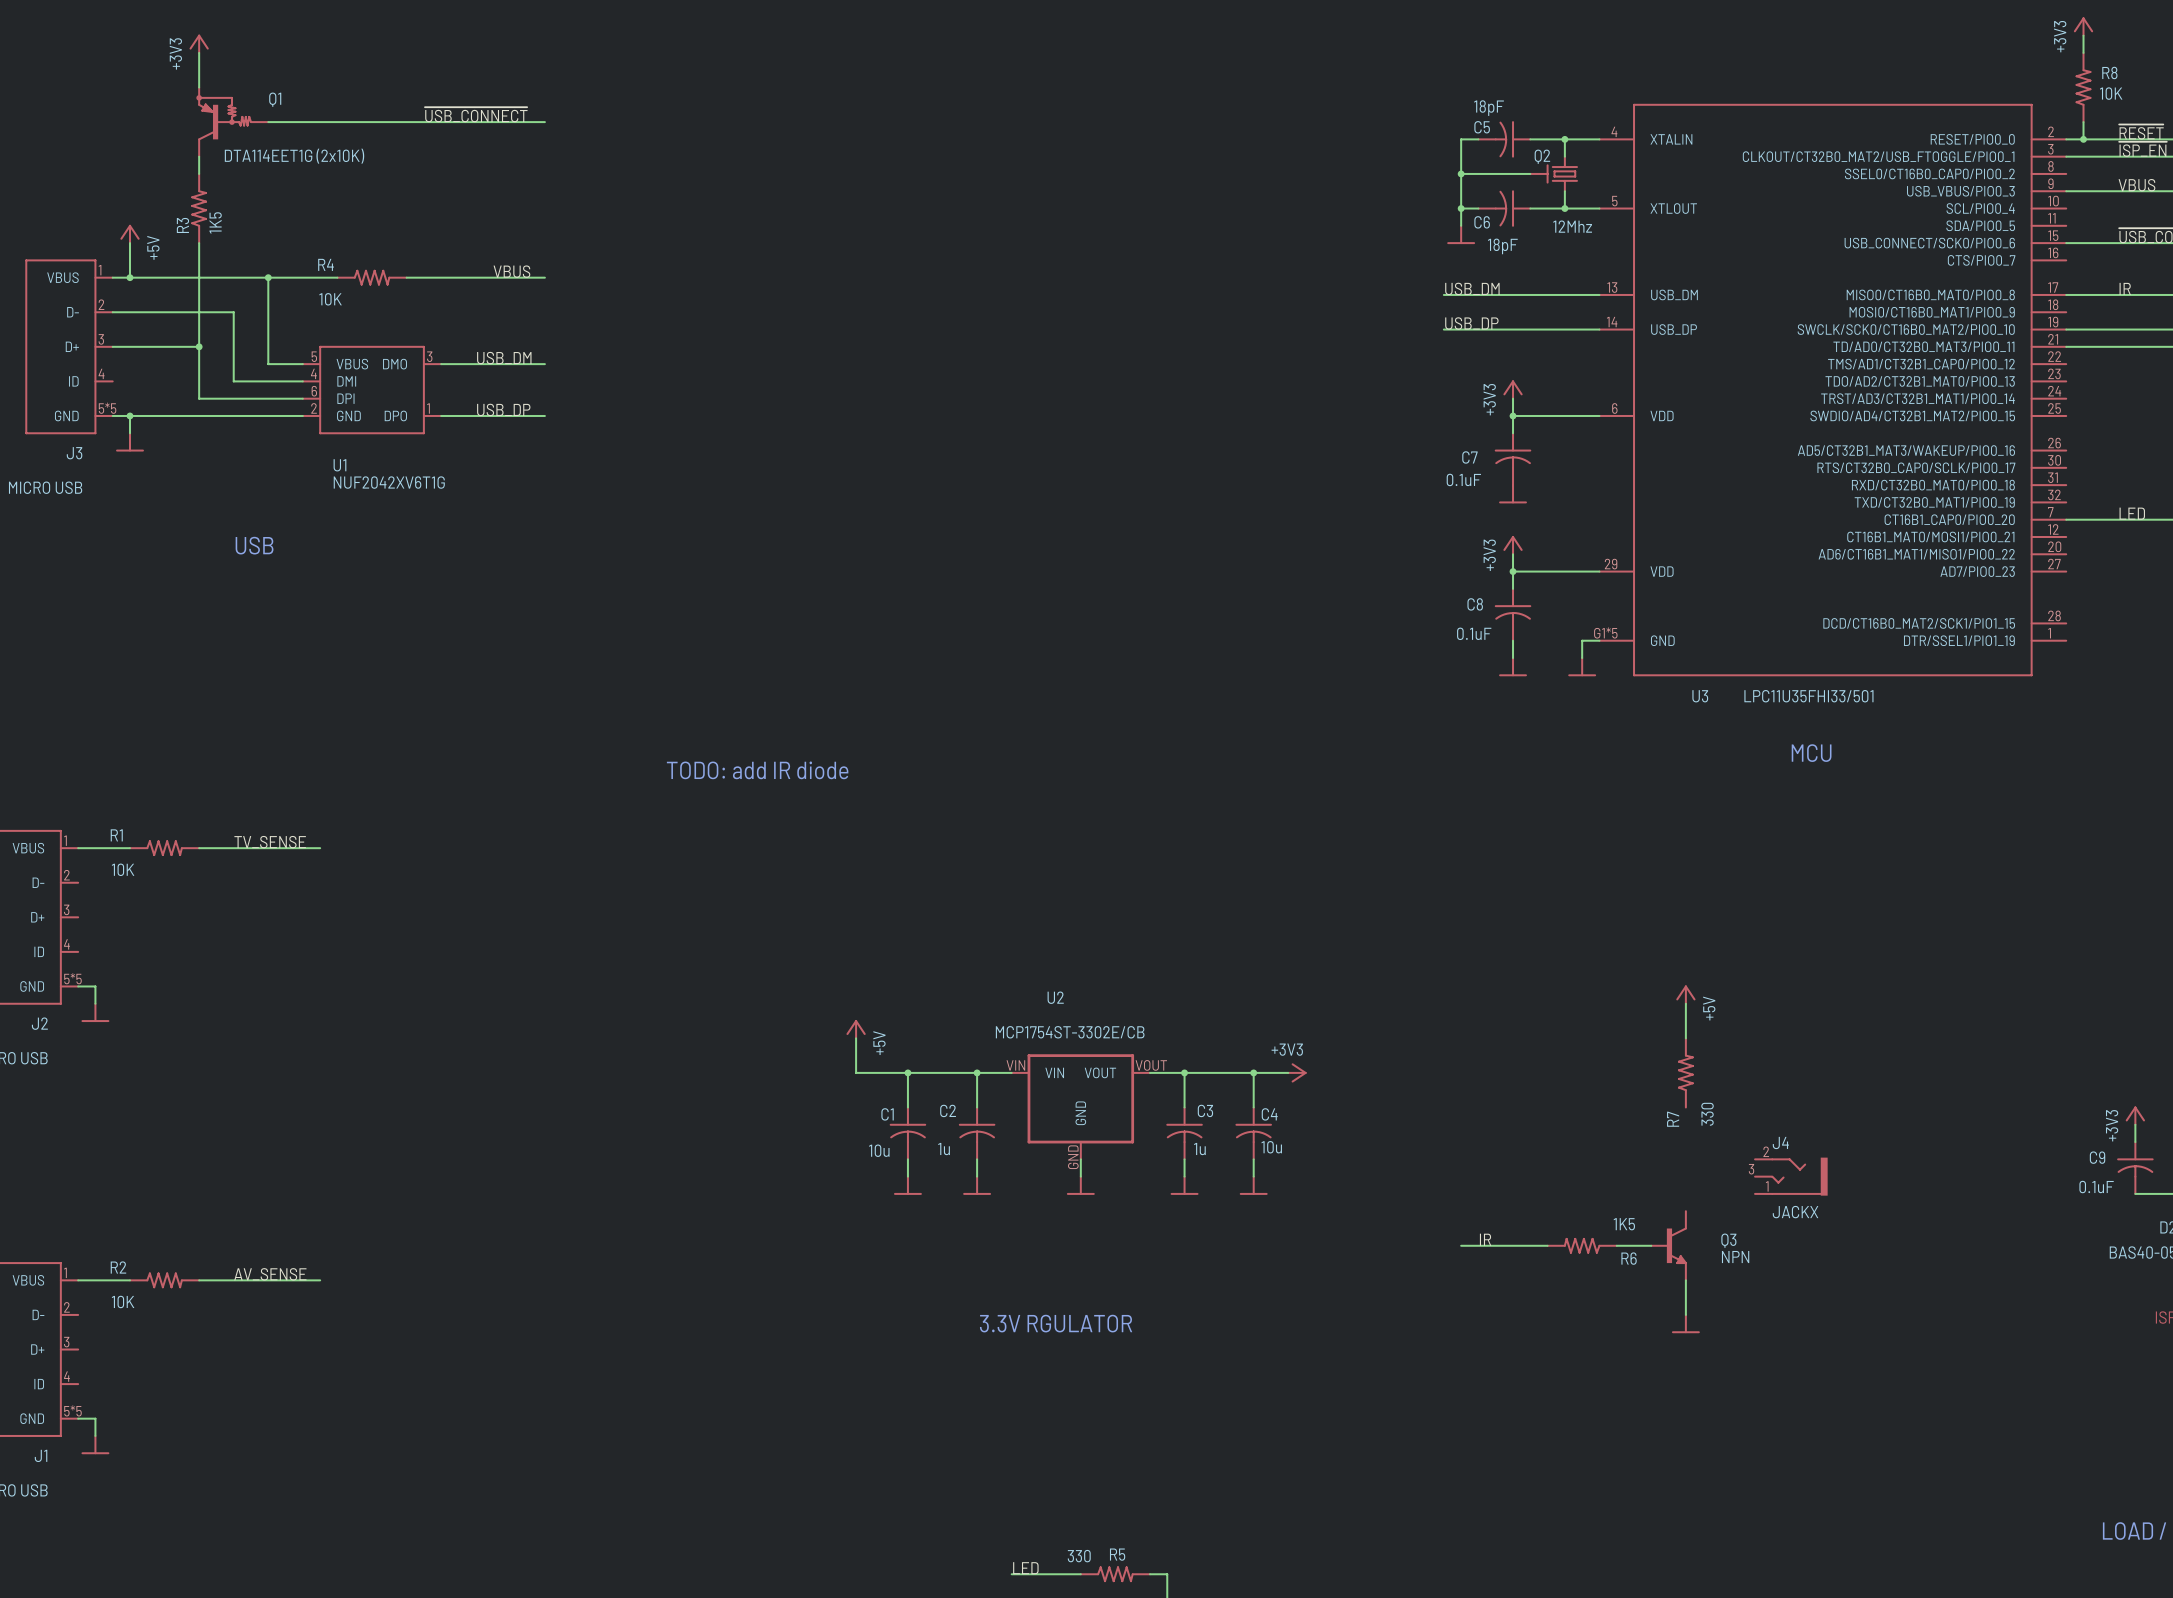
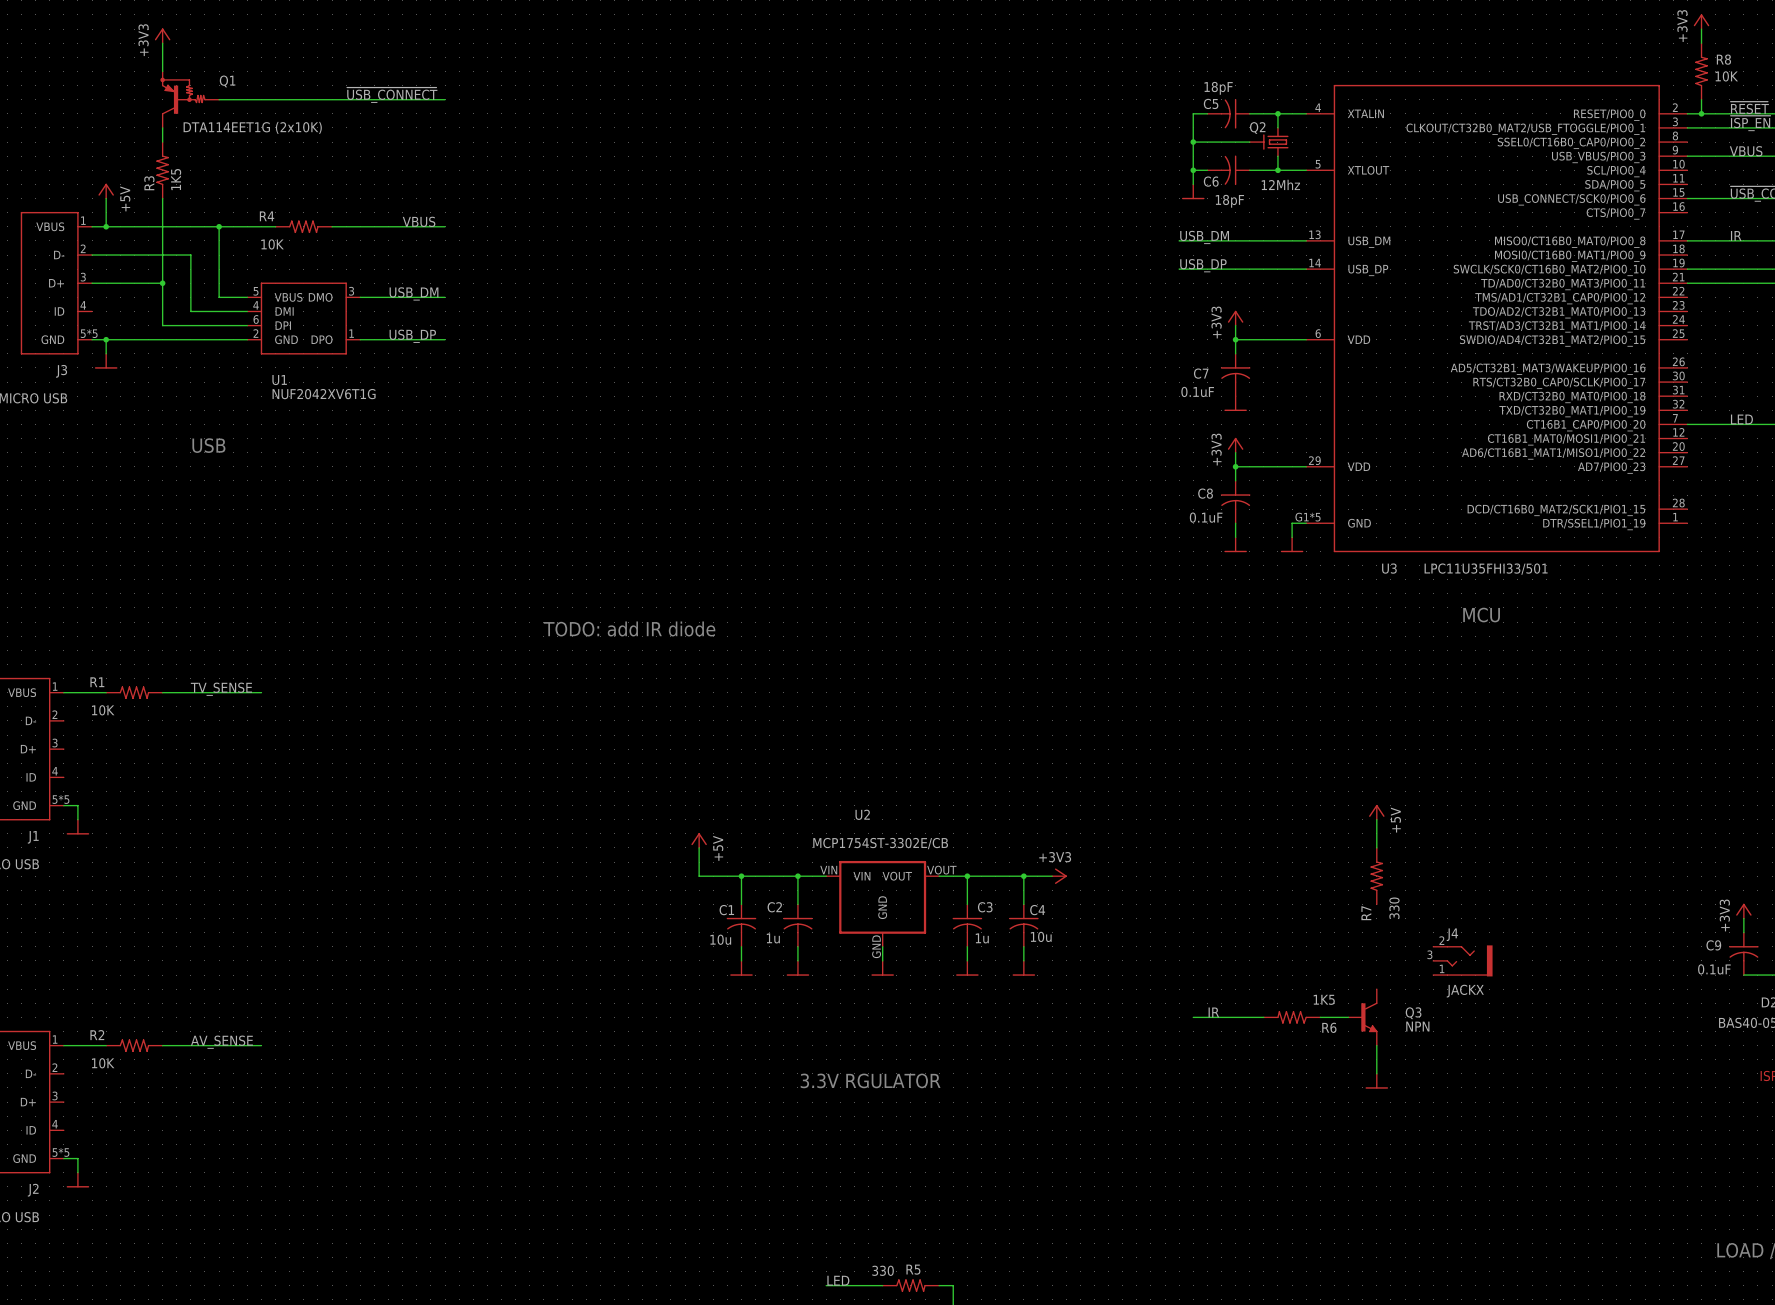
J2 name: J2 (39, 1023) -> J1 (33, 837)
J1 name: J1 (41, 1455) -> J2 (33, 1190)

